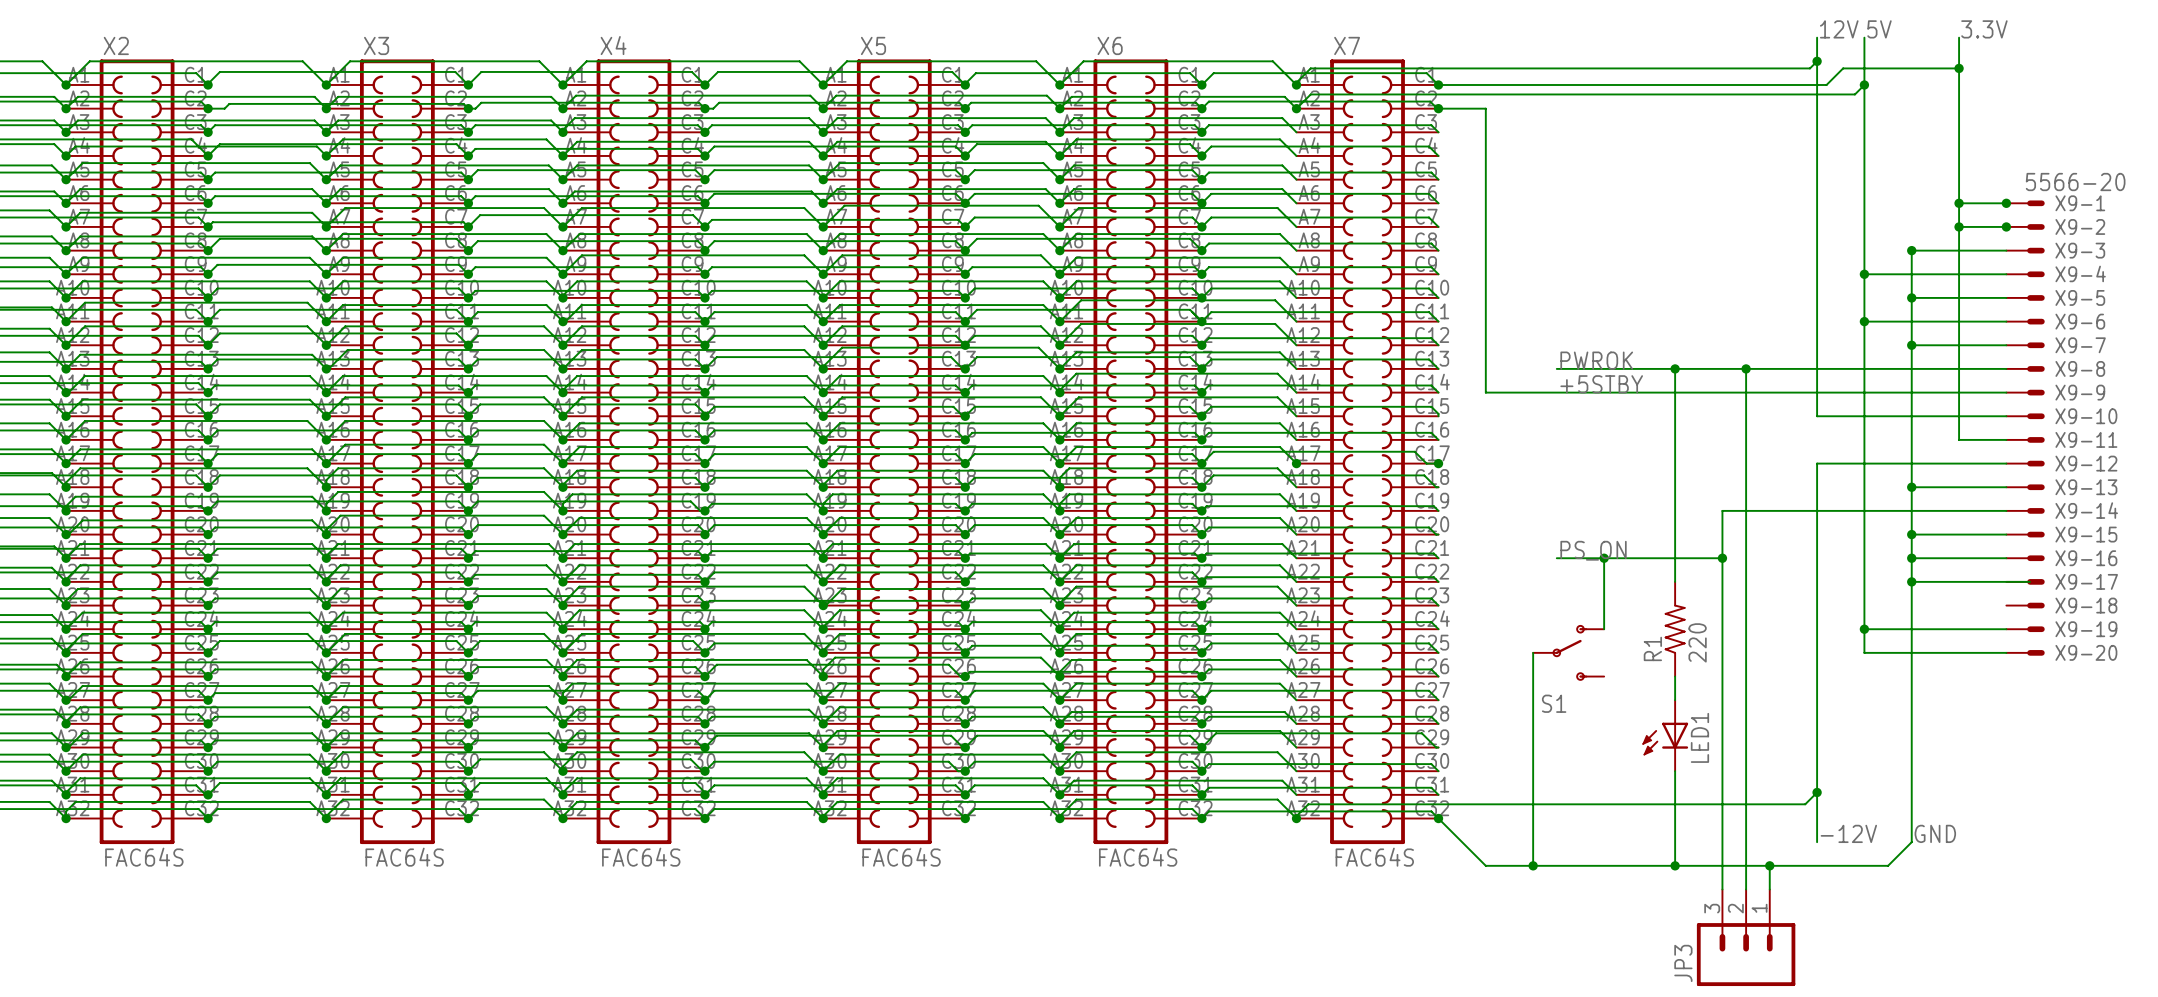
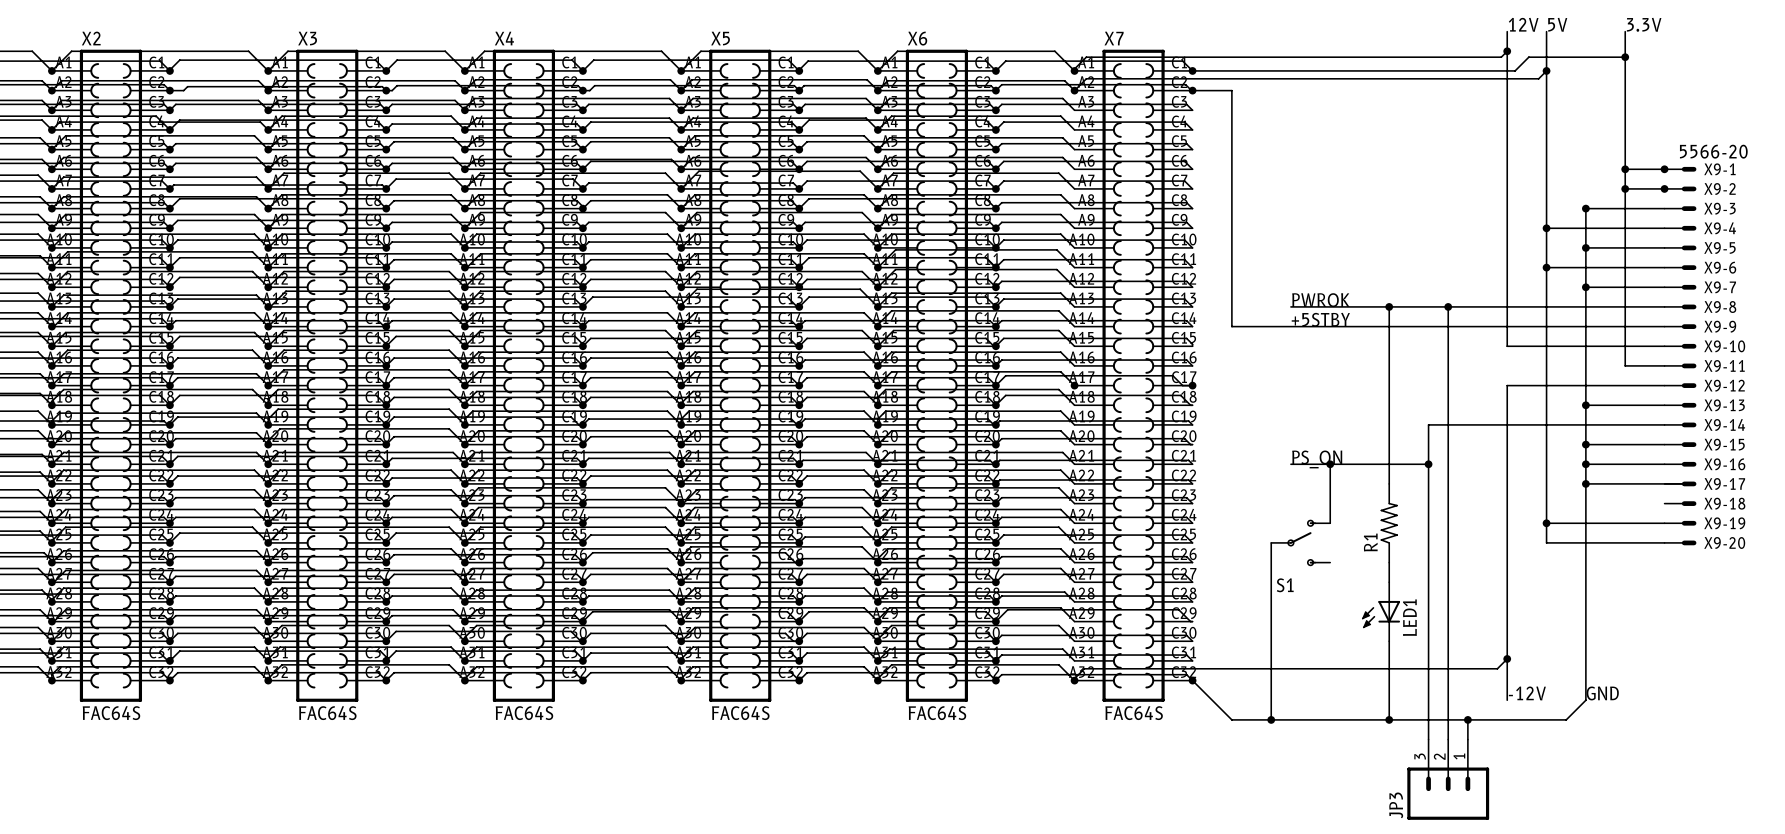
R1 value: 220 (1697, 642) -> none

